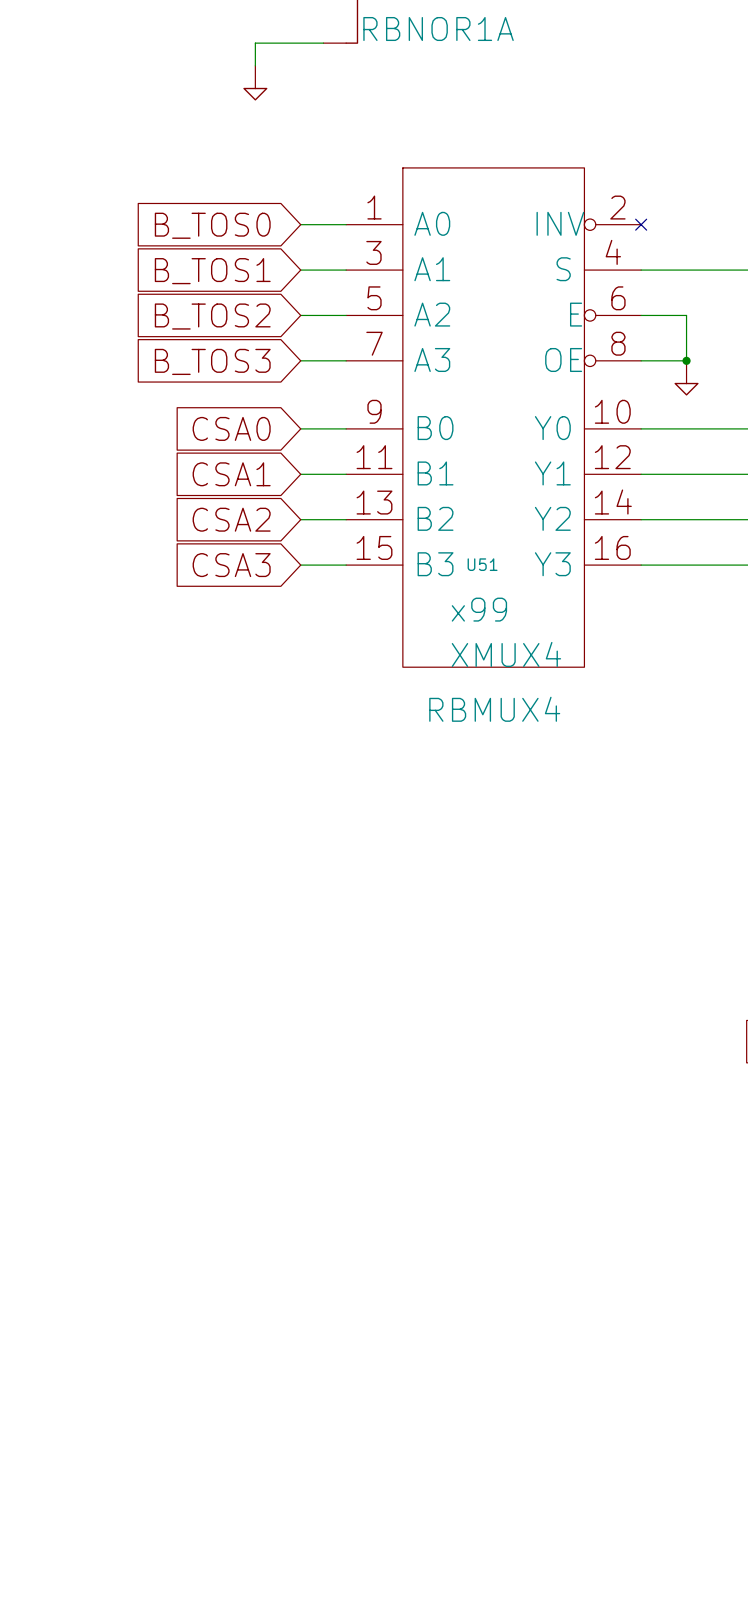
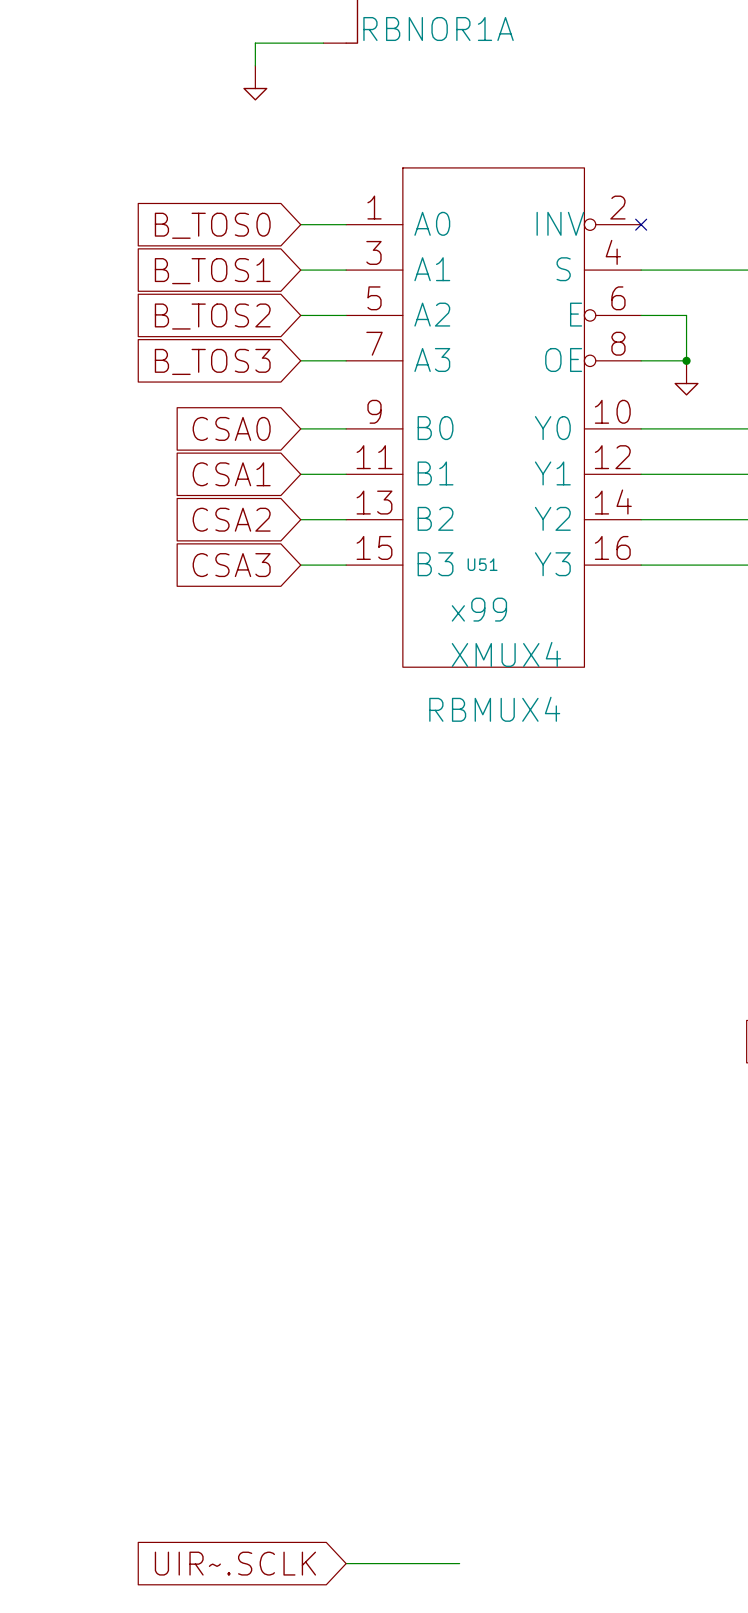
global label: none -> UIR~.SCLK (235, 1563)
wire: none -> (346, 1563) (459, 1563)

